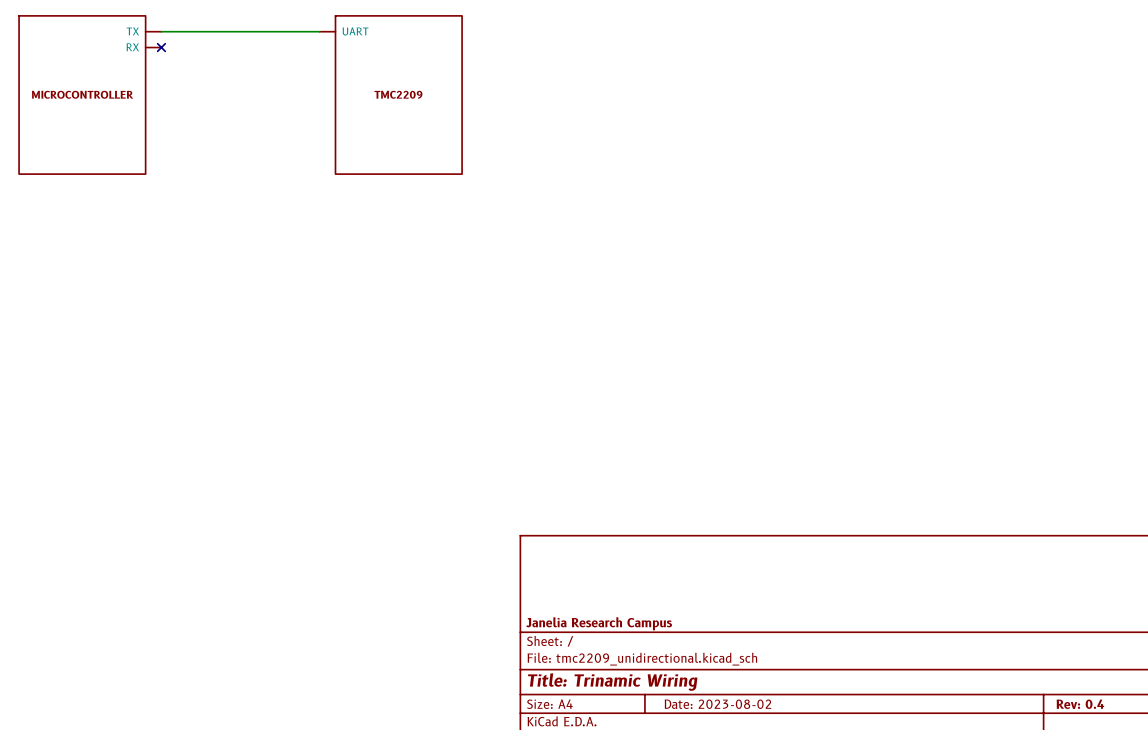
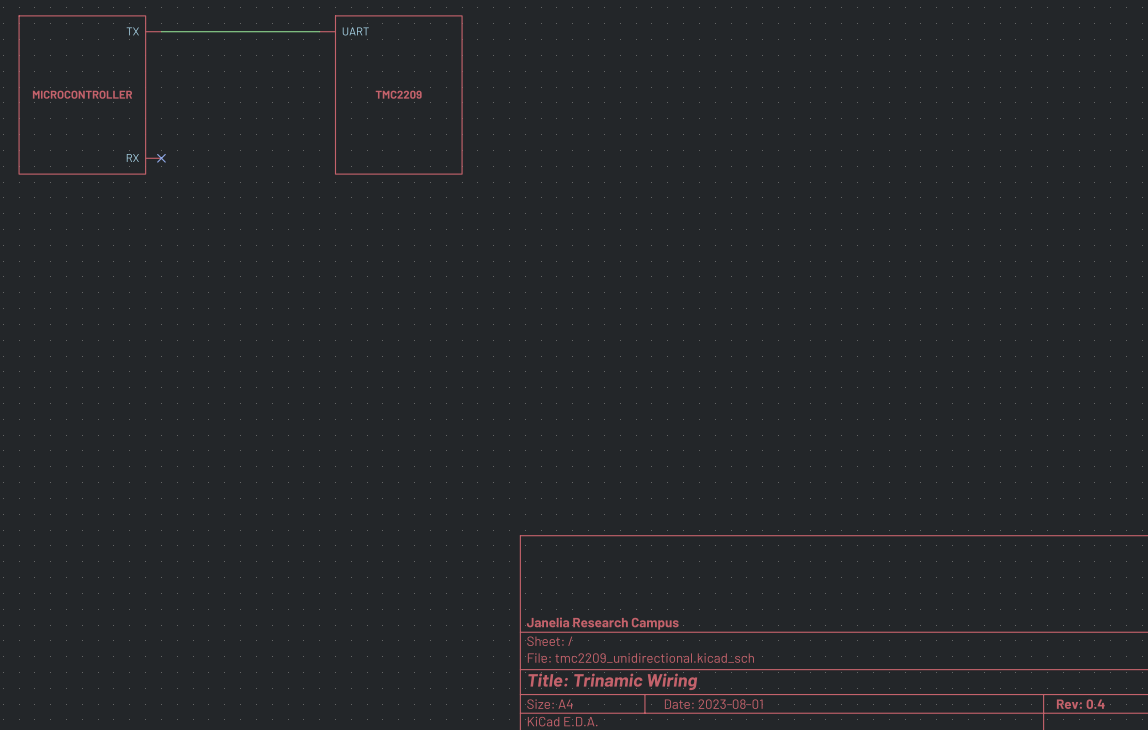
part symbol: [19, 15, 162, 175] -> [19, 15, 162, 175]
no-connect mark: (161, 47) -> none
no-connect mark: none -> (161, 158)
title block: Date: 2023-08-02 (717, 704) -> Date: 2023-08-01 (713, 704)

